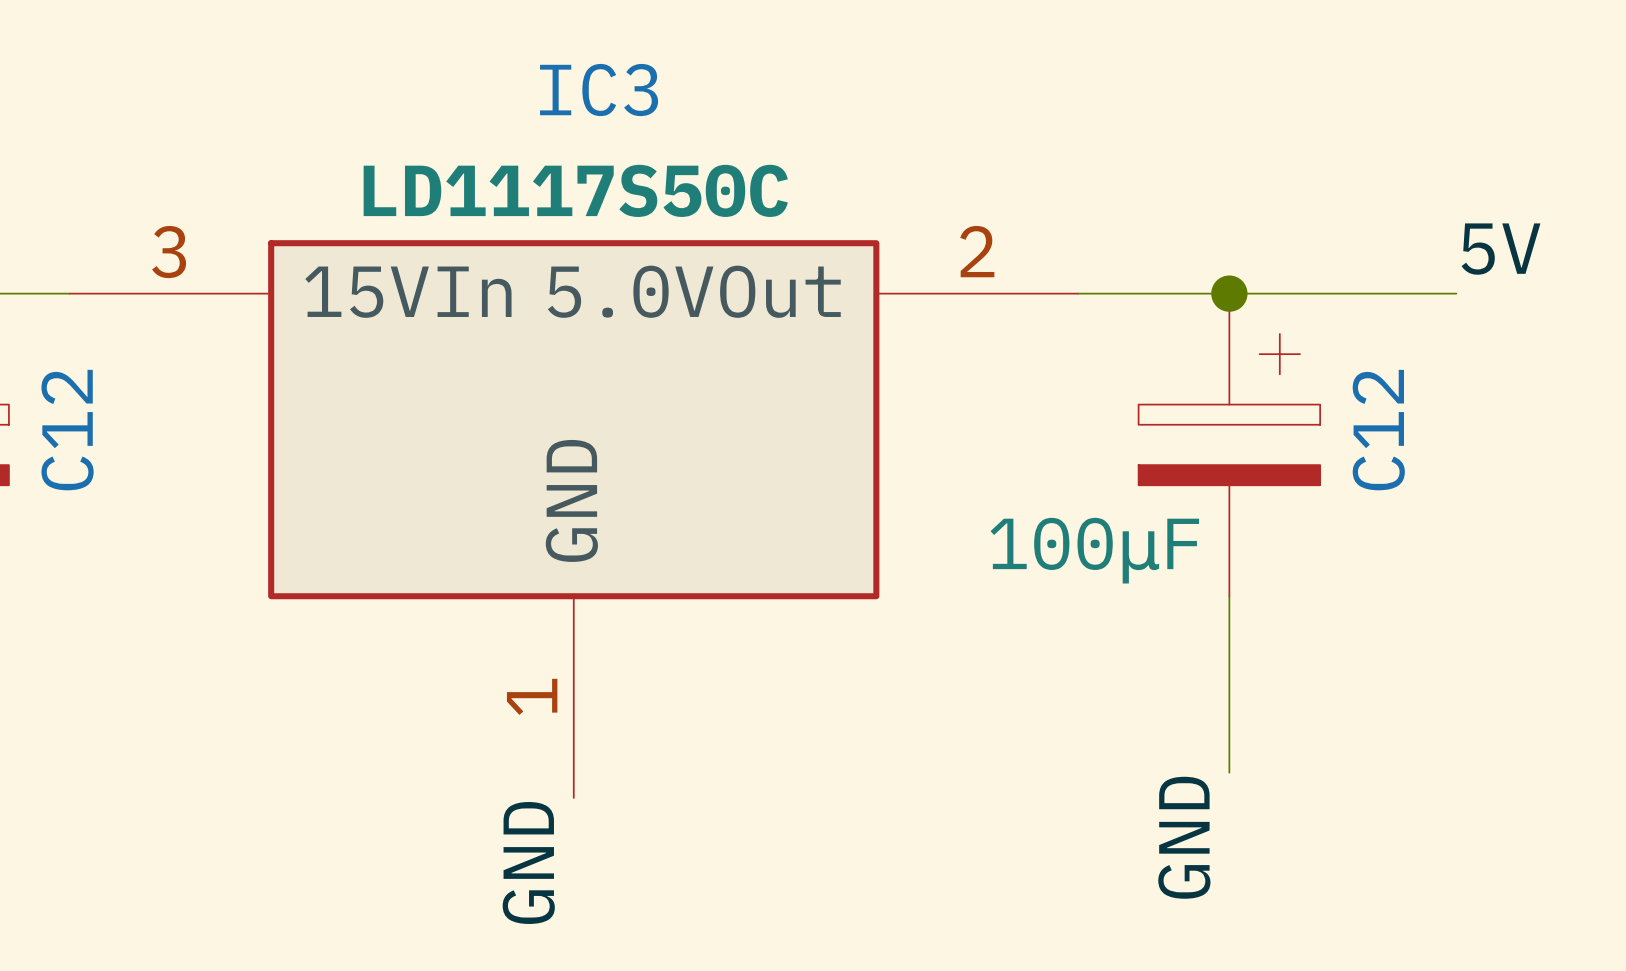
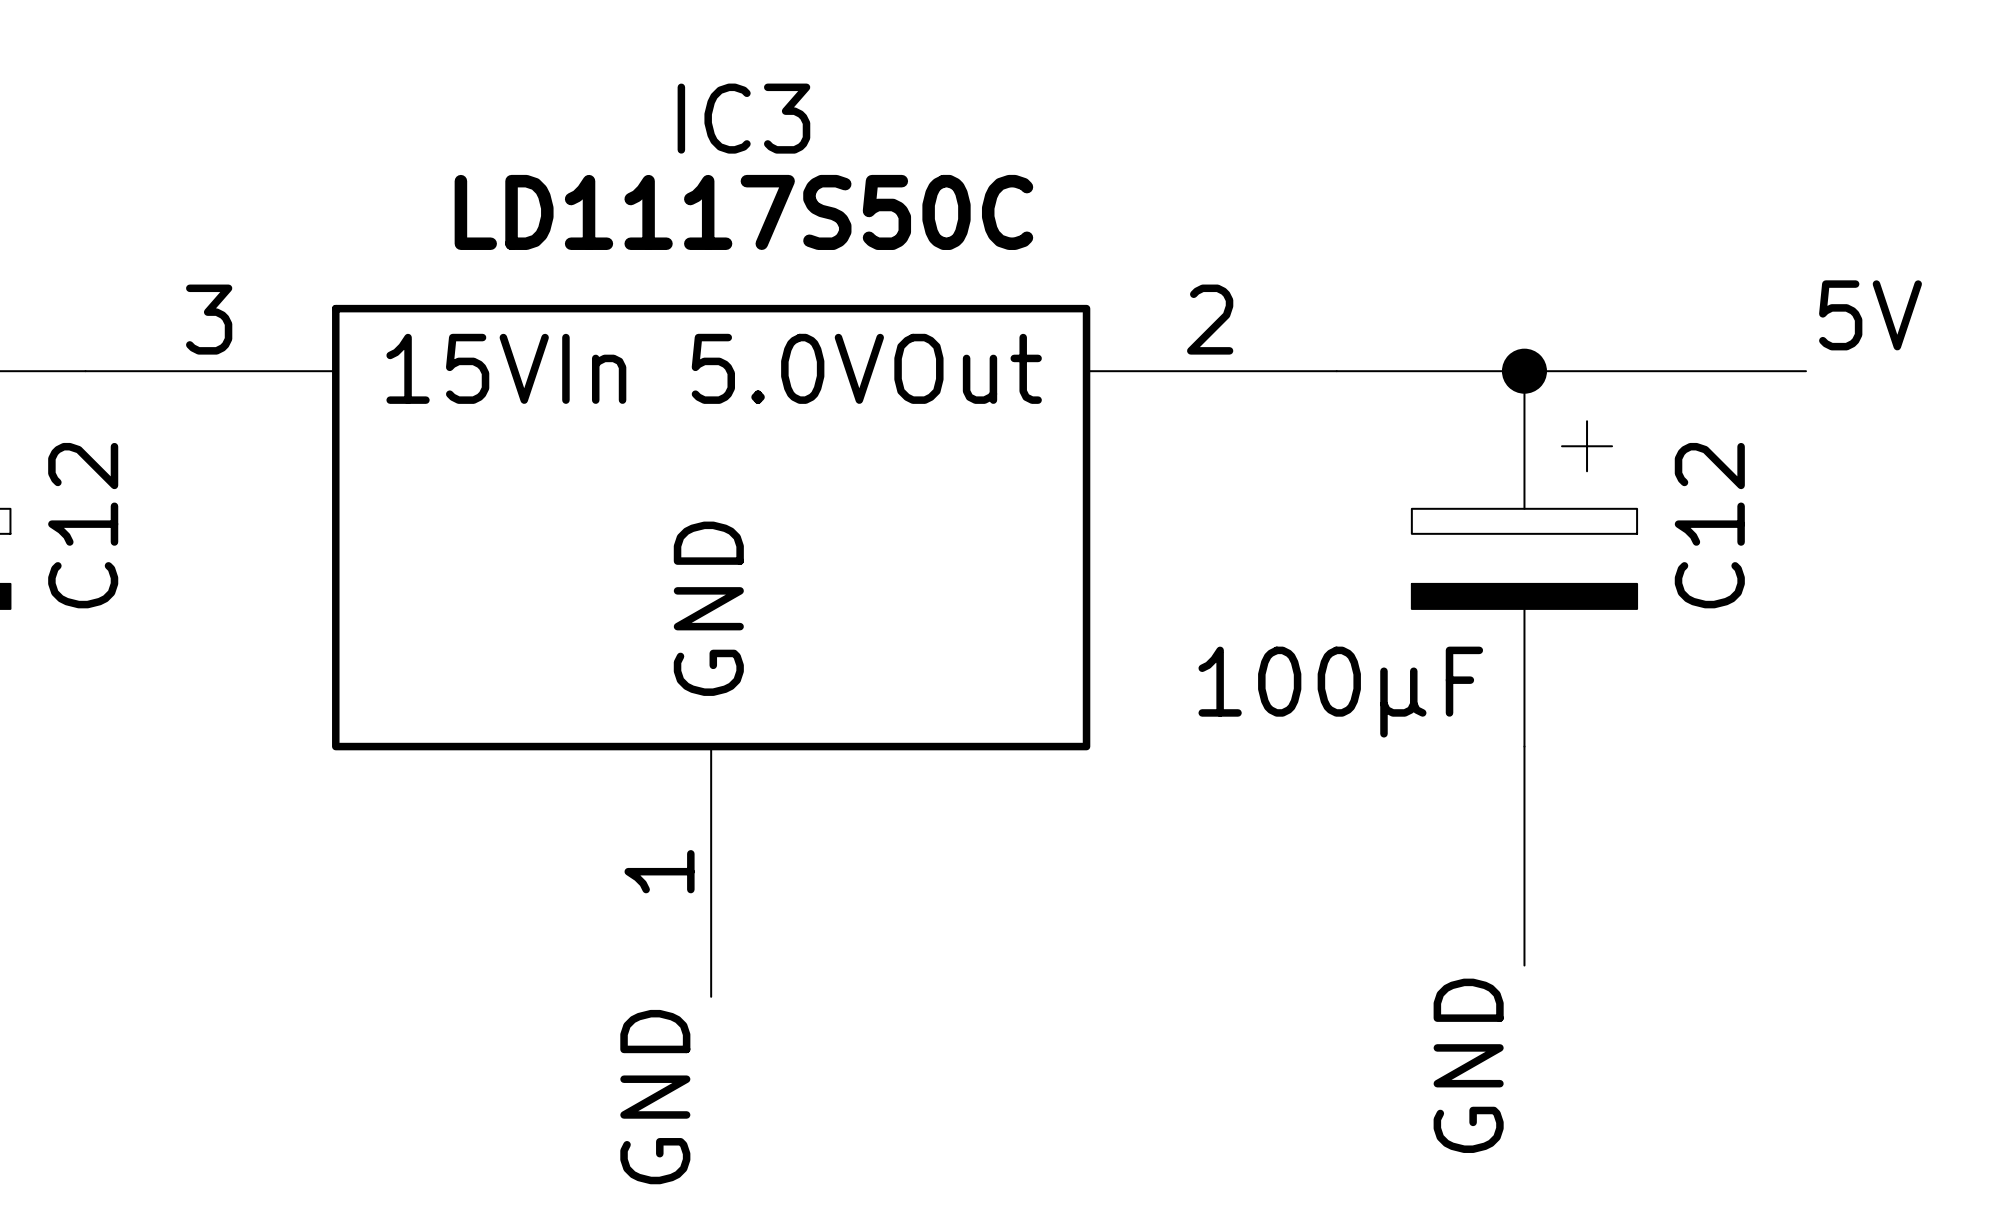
IC3 value position: LD1117S50C (575, 190) -> LD1117S50C (743, 212)

